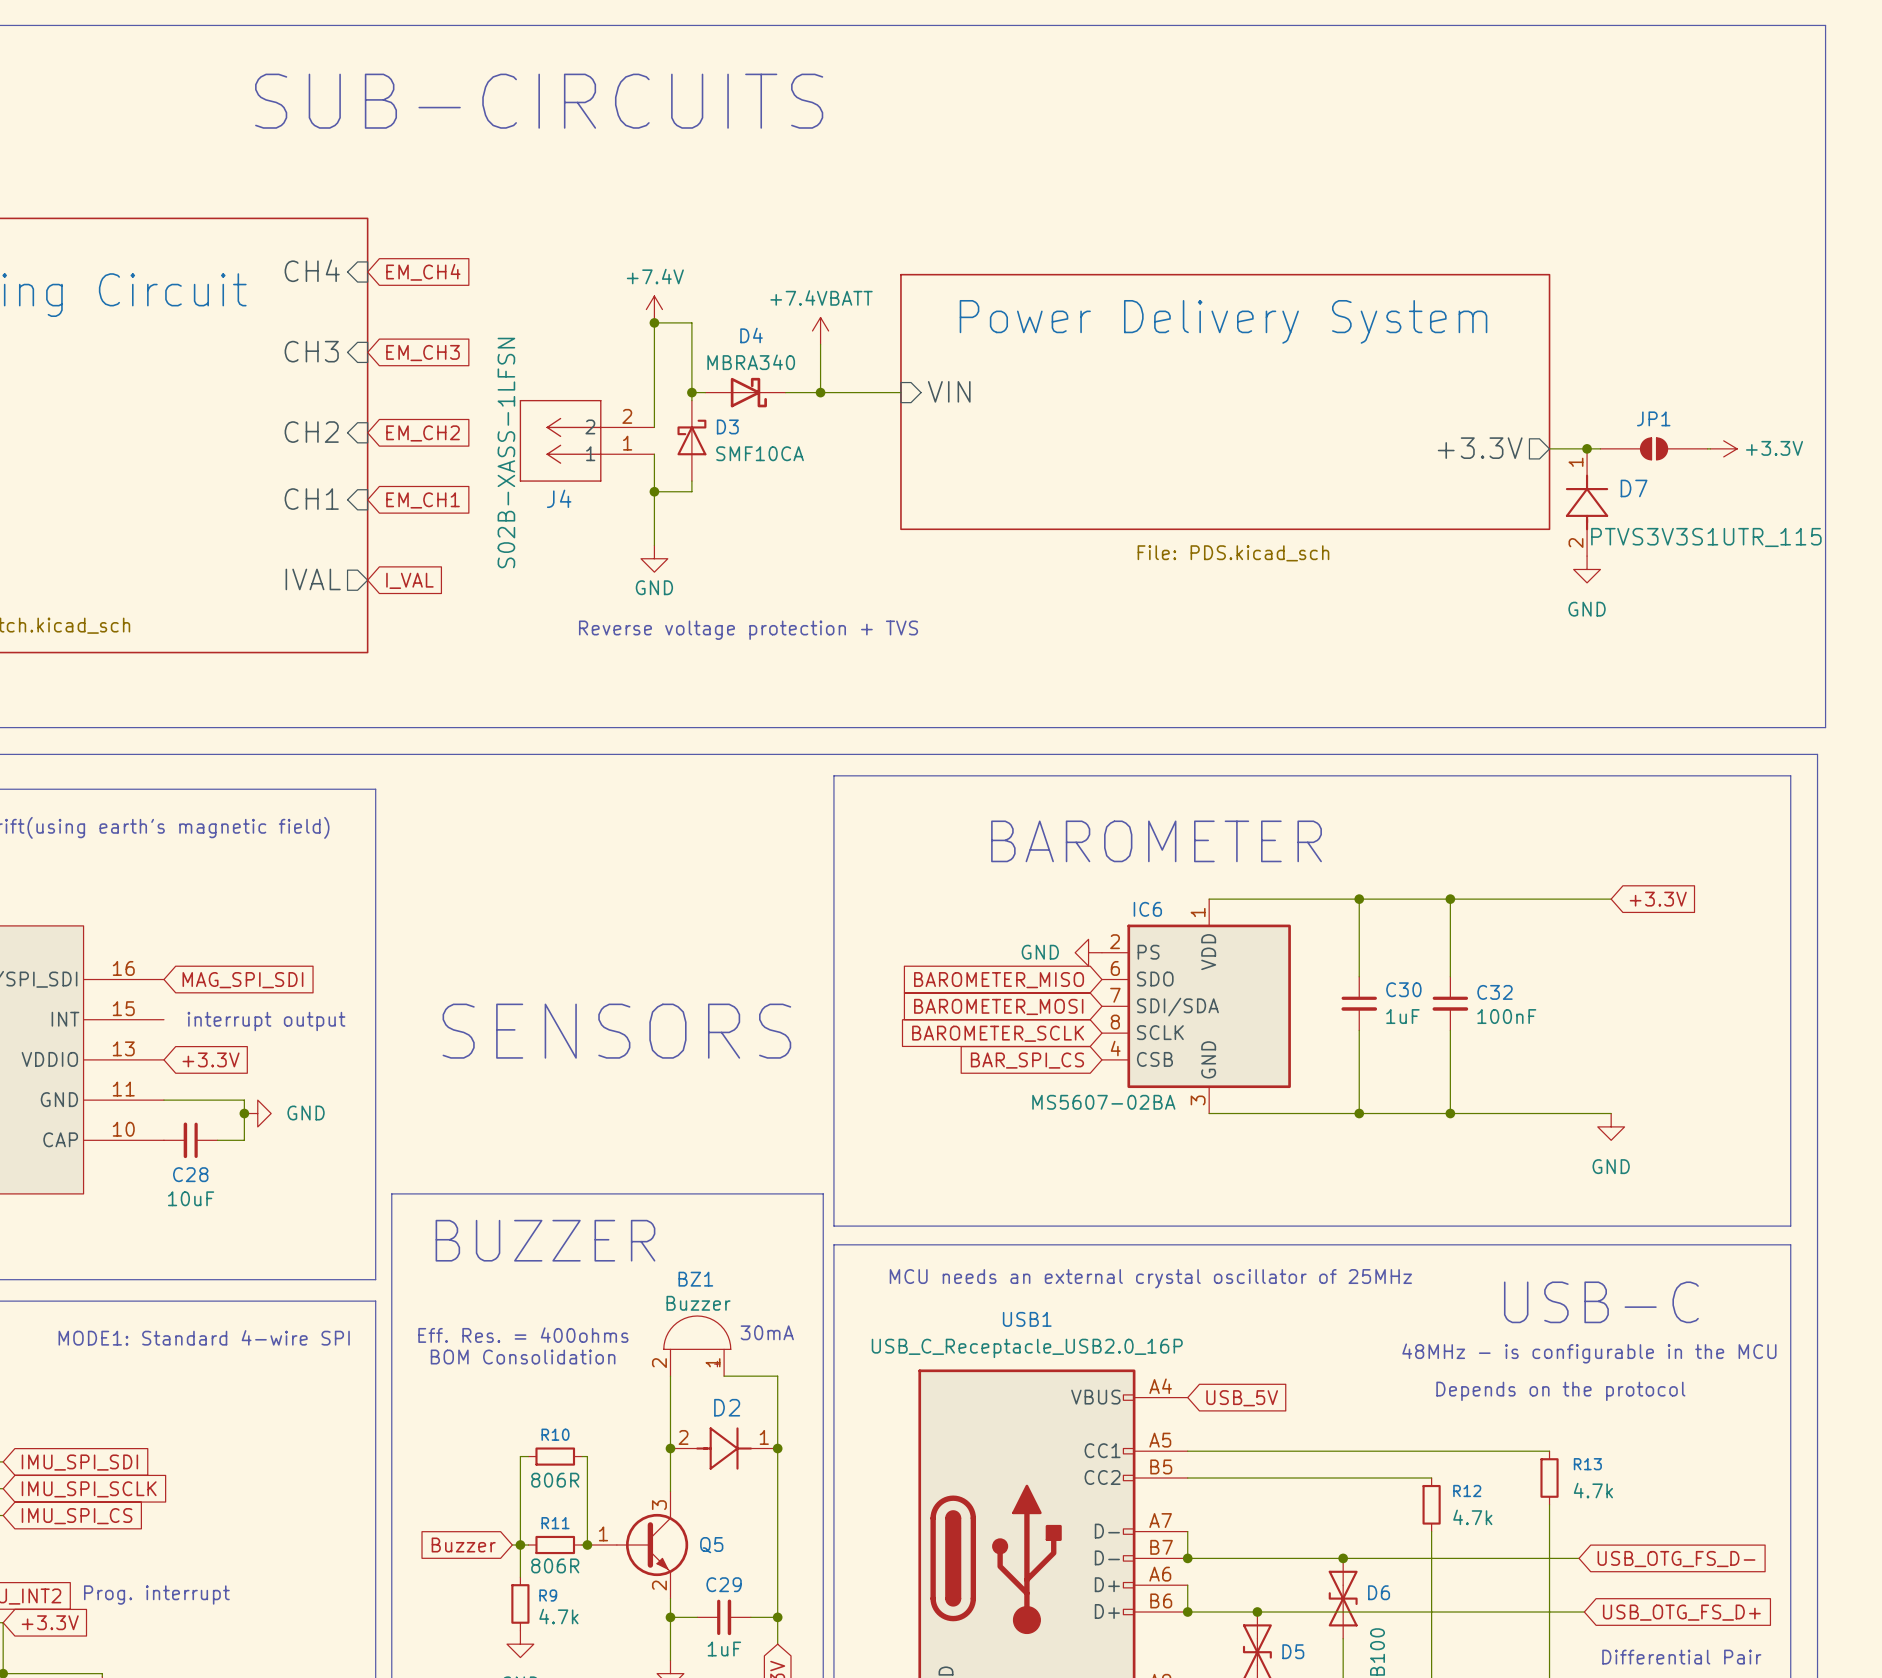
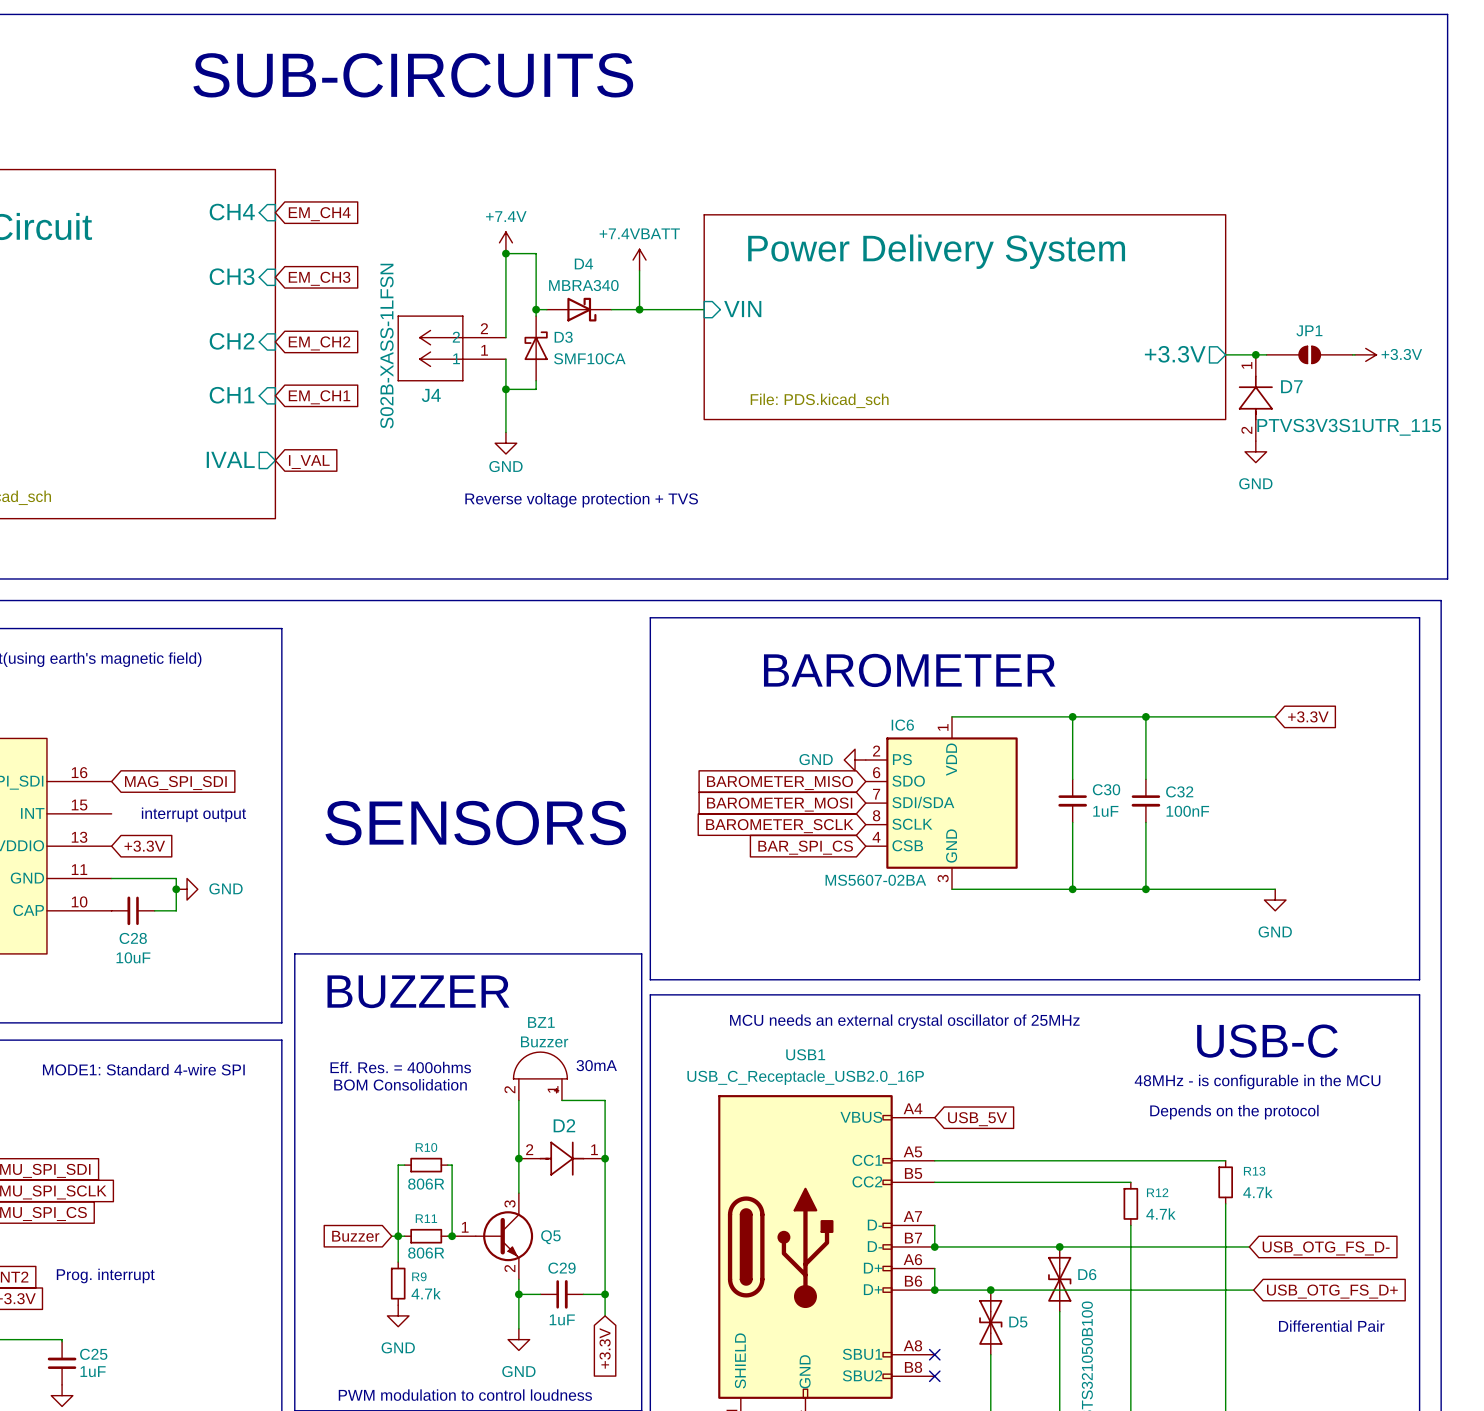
sheet Power Delivery System value position: File: PDS.kicad_sch (1233, 553) -> File: PDS.kicad_sch (819, 400)

